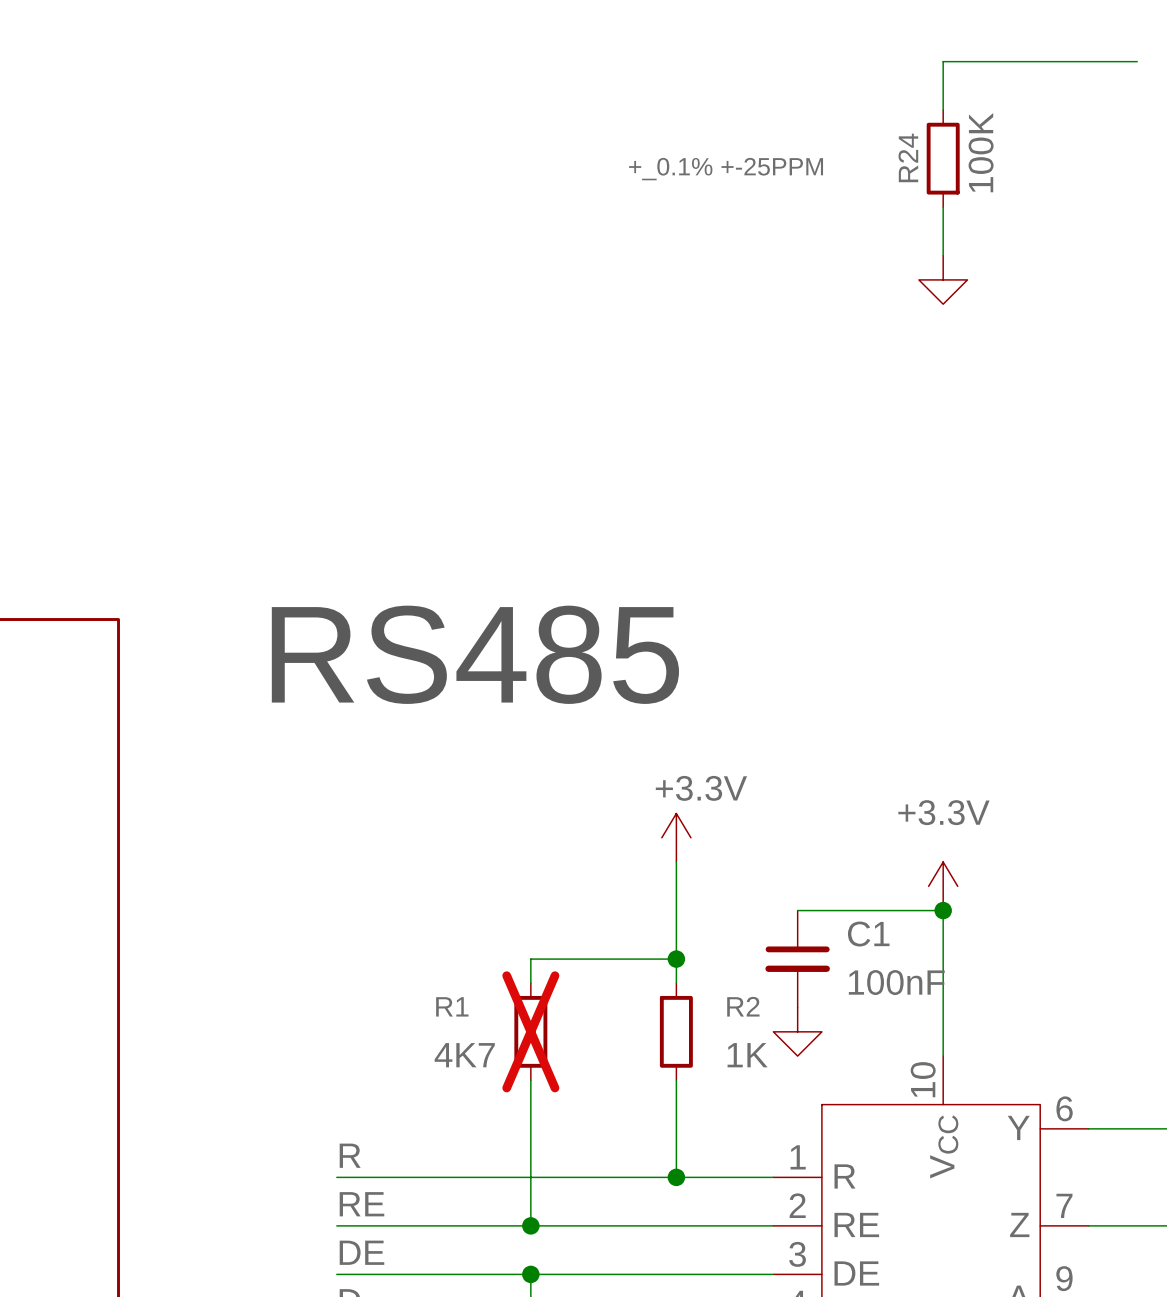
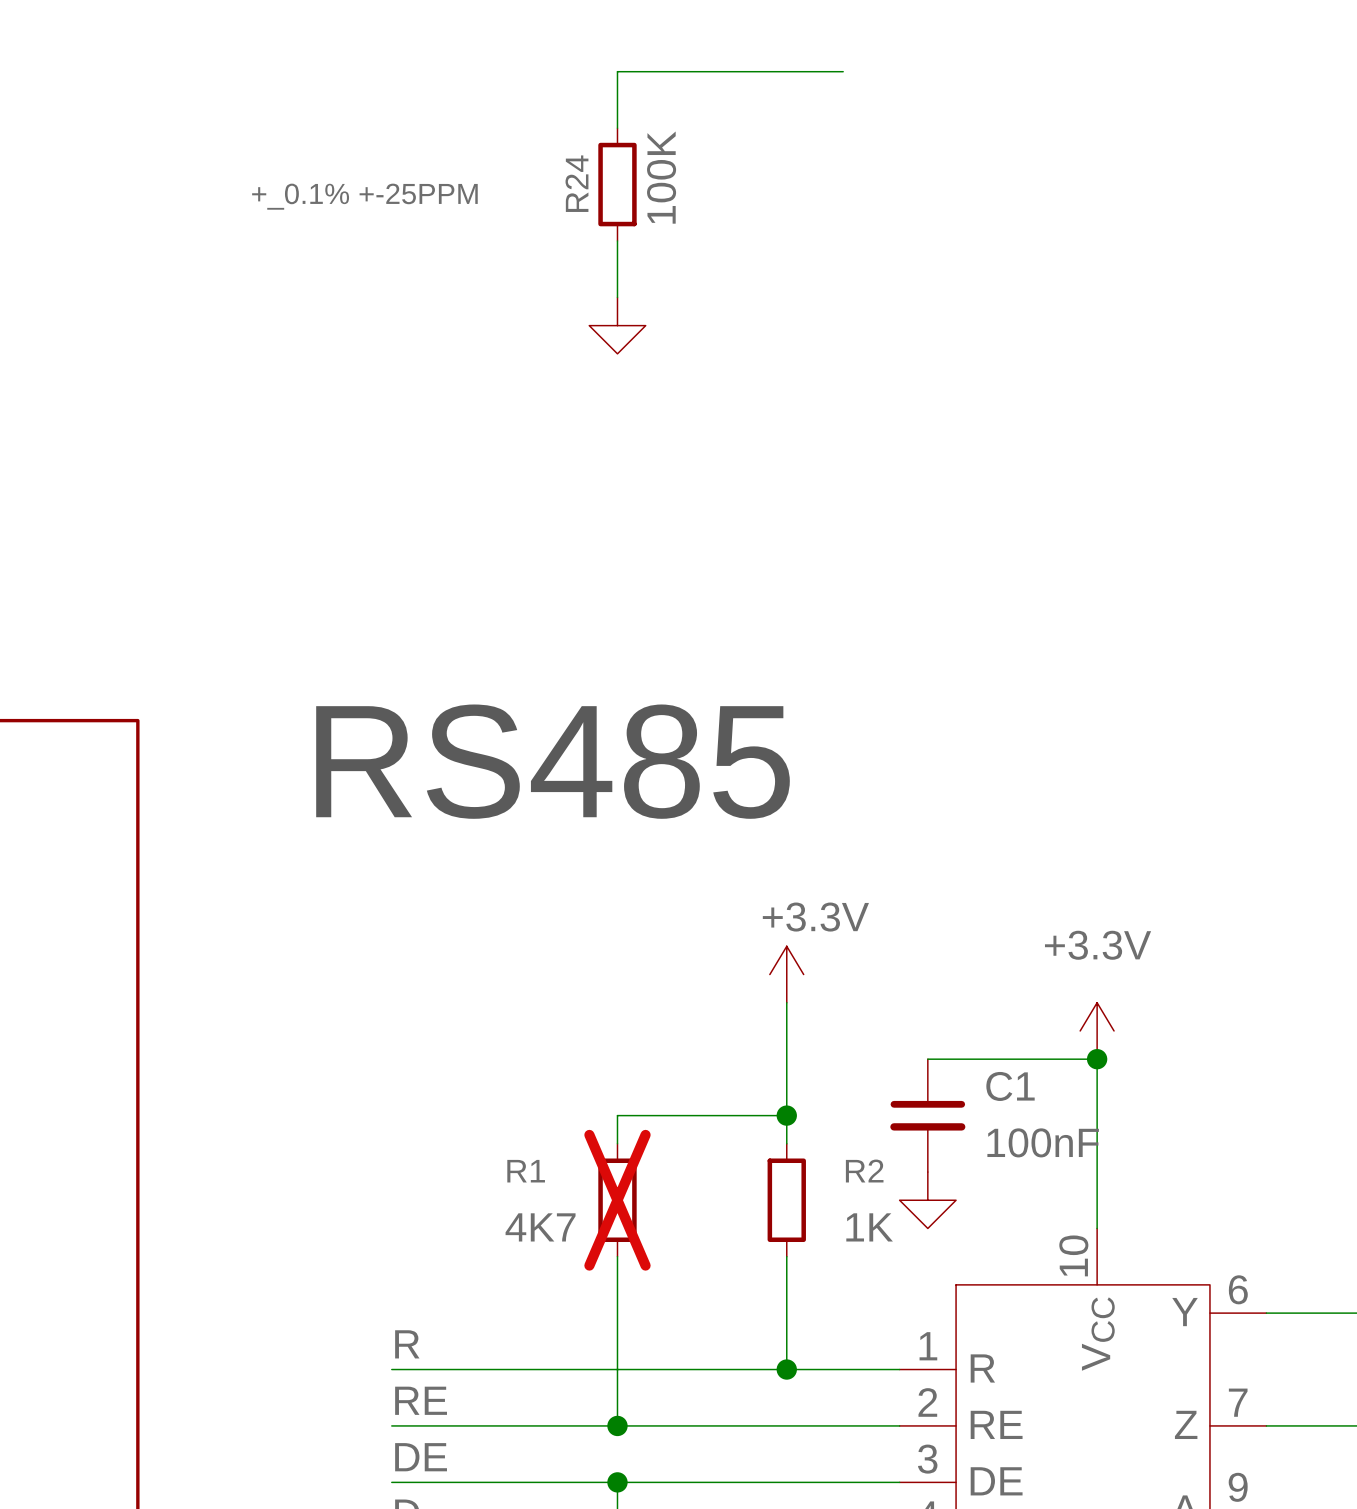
wire: (1137, 61) (943, 61) (943, 110) -> (843, 71) (617, 71) (617, 128)
R24 position: (943, 158) -> (617, 184)
label position: +_0.1% +-25PPM (726, 169) -> +_0.1% +-25PPM (364, 196)
wire: (943, 207) (943, 255) -> (617, 240) (617, 297)
power symbol position: (943, 279) -> (617, 325)

